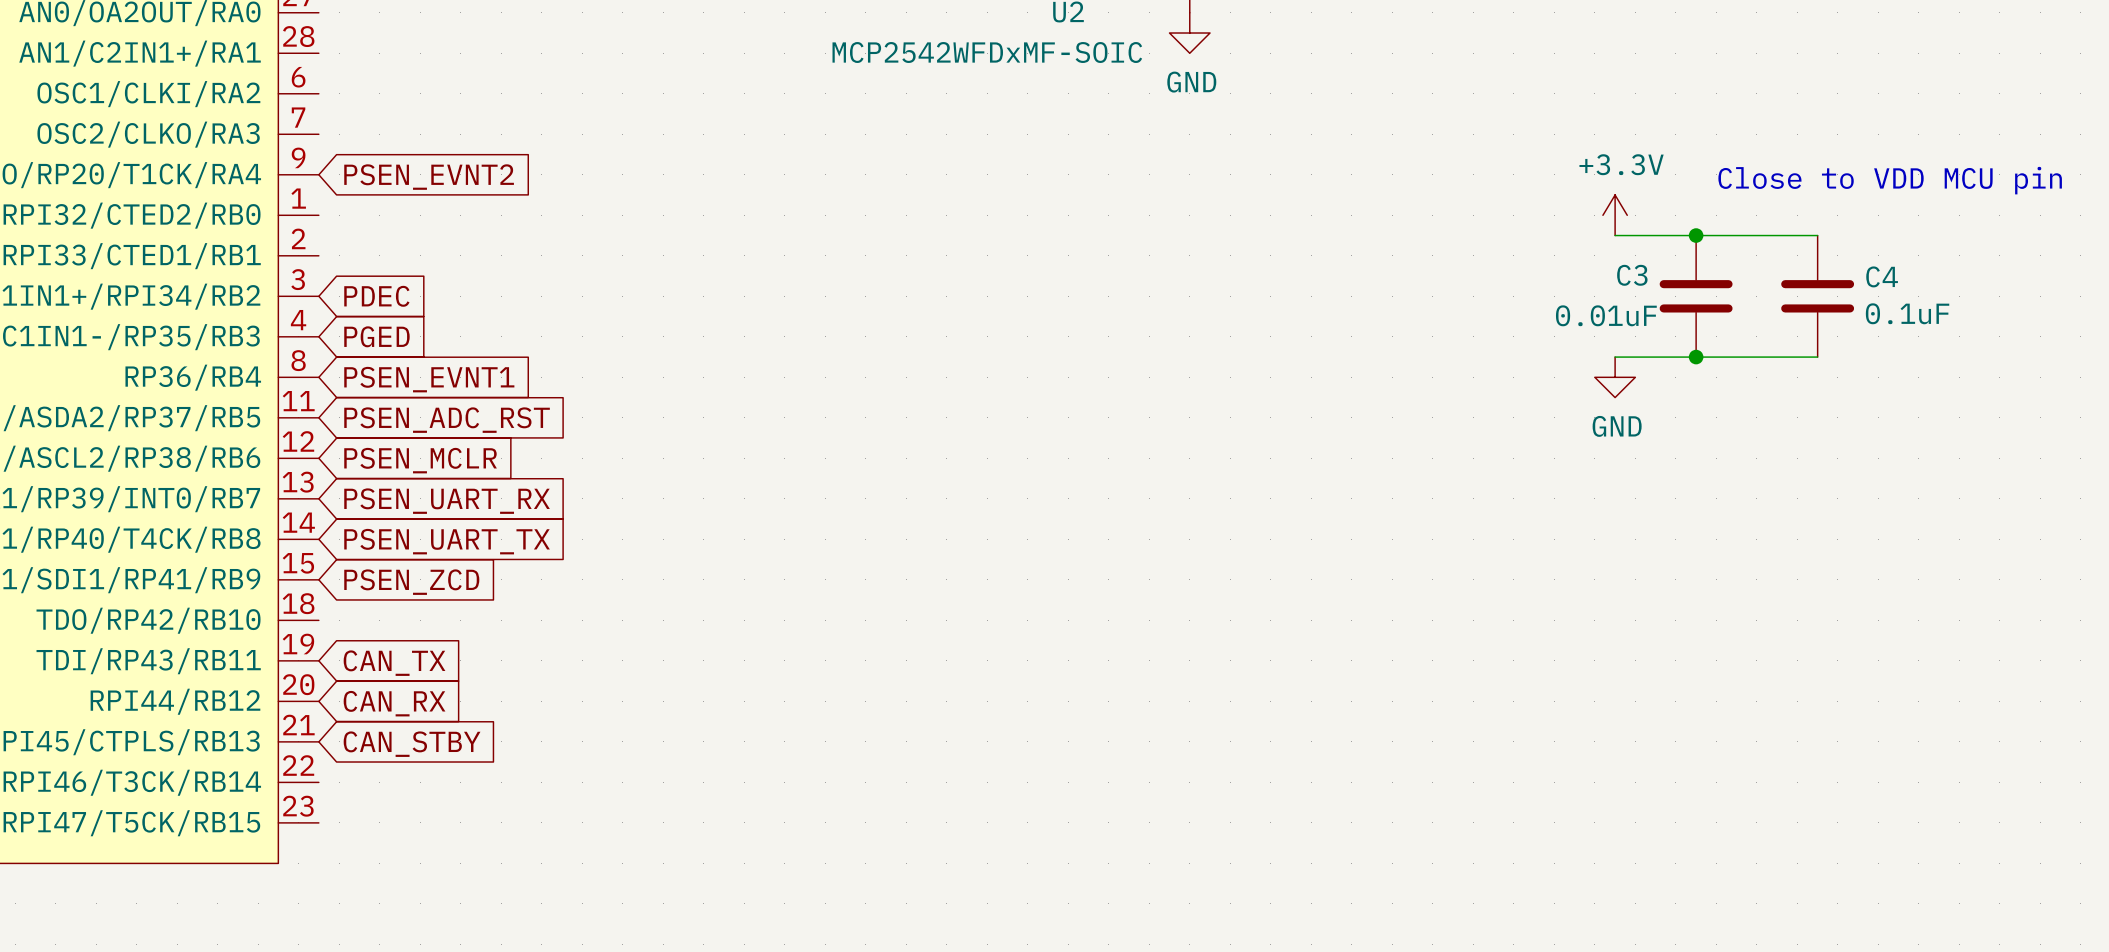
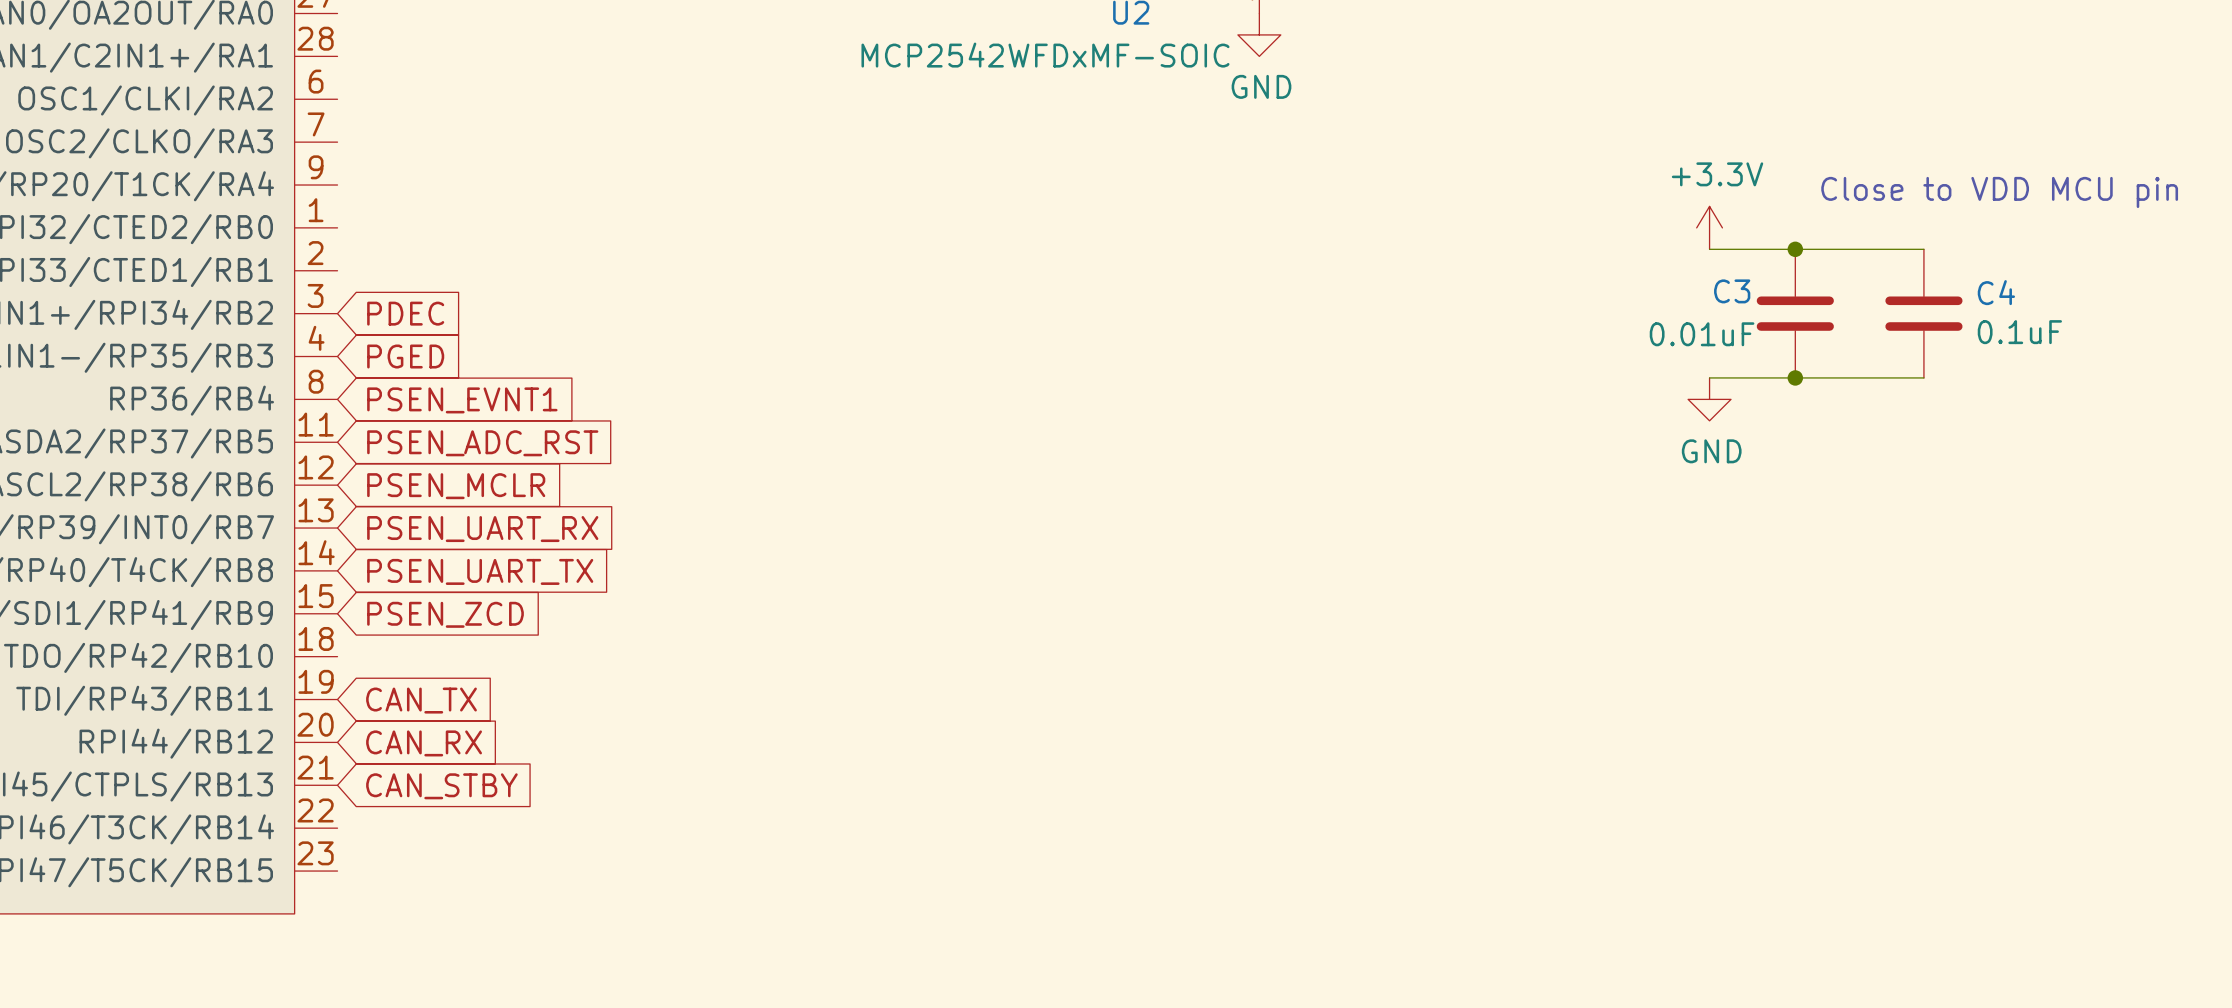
global label: PSEN_EVNT2 (429, 177) -> none

